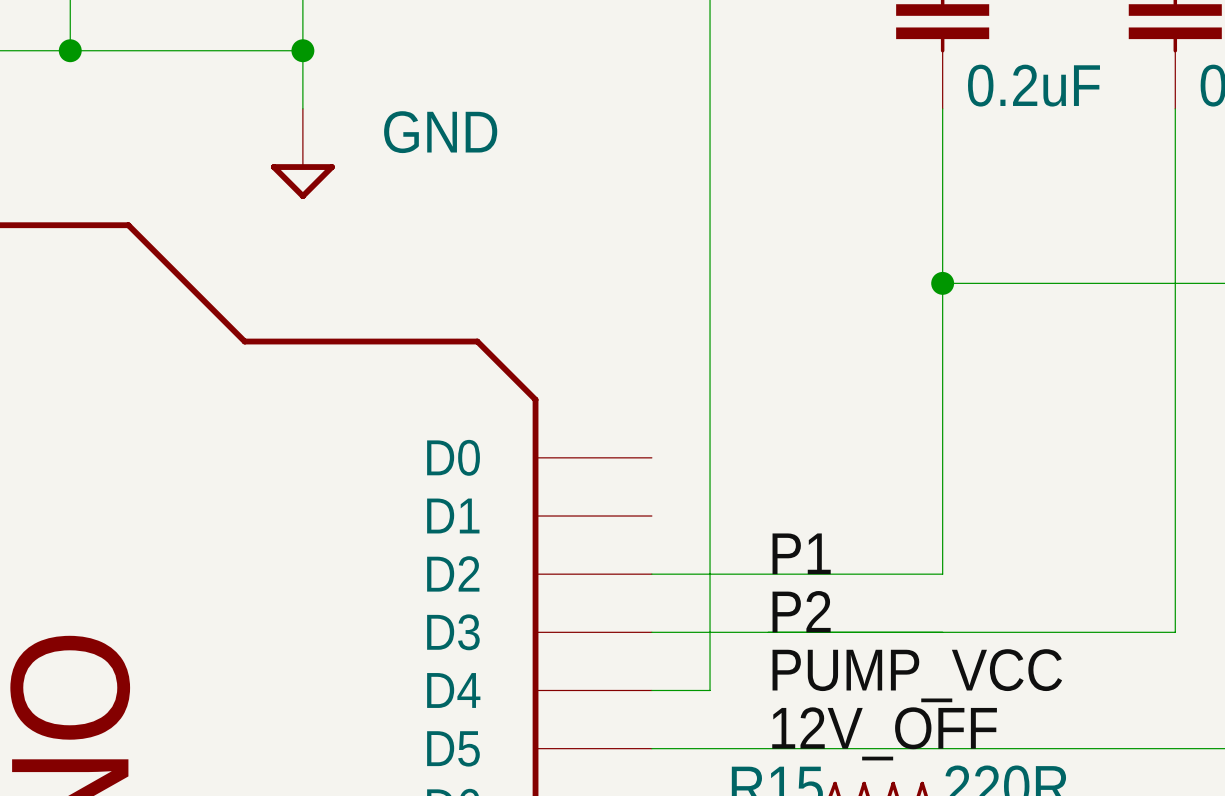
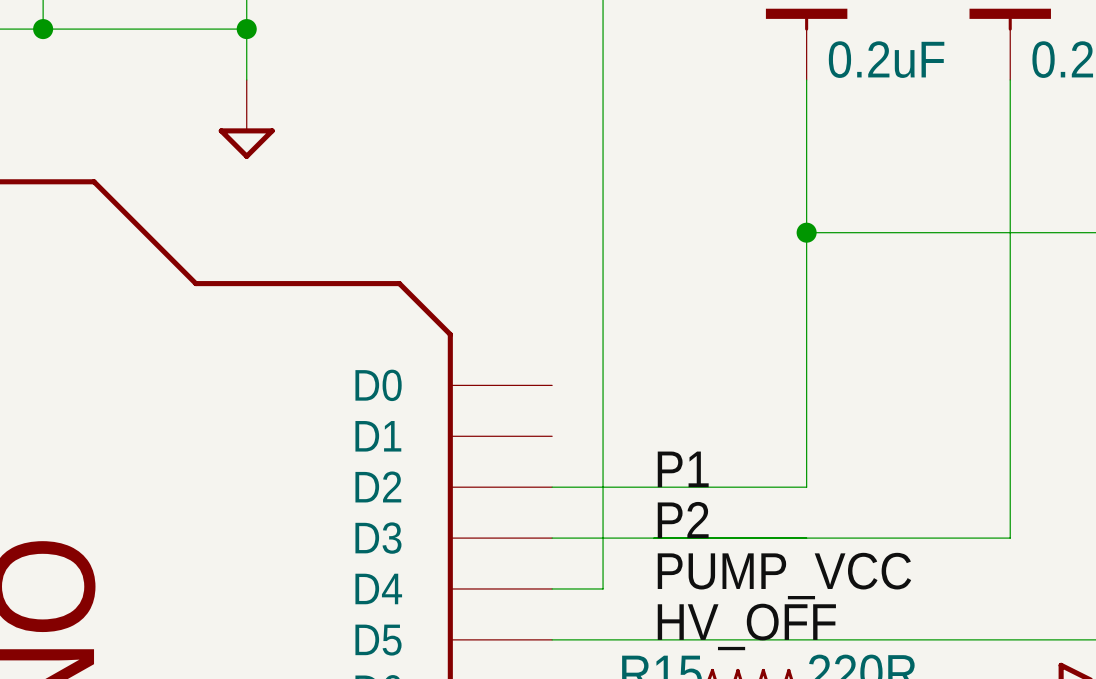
power symbol text: GND (440, 132) -> none
label: 12V_OFF (884, 733) -> HV_OFF (746, 626)

